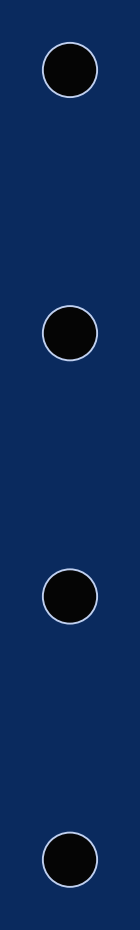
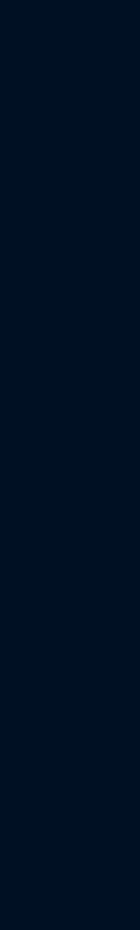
part: (69, 69) -> none
part: (69, 333) -> none
part: (69, 596) -> none
part: (69, 859) -> none

